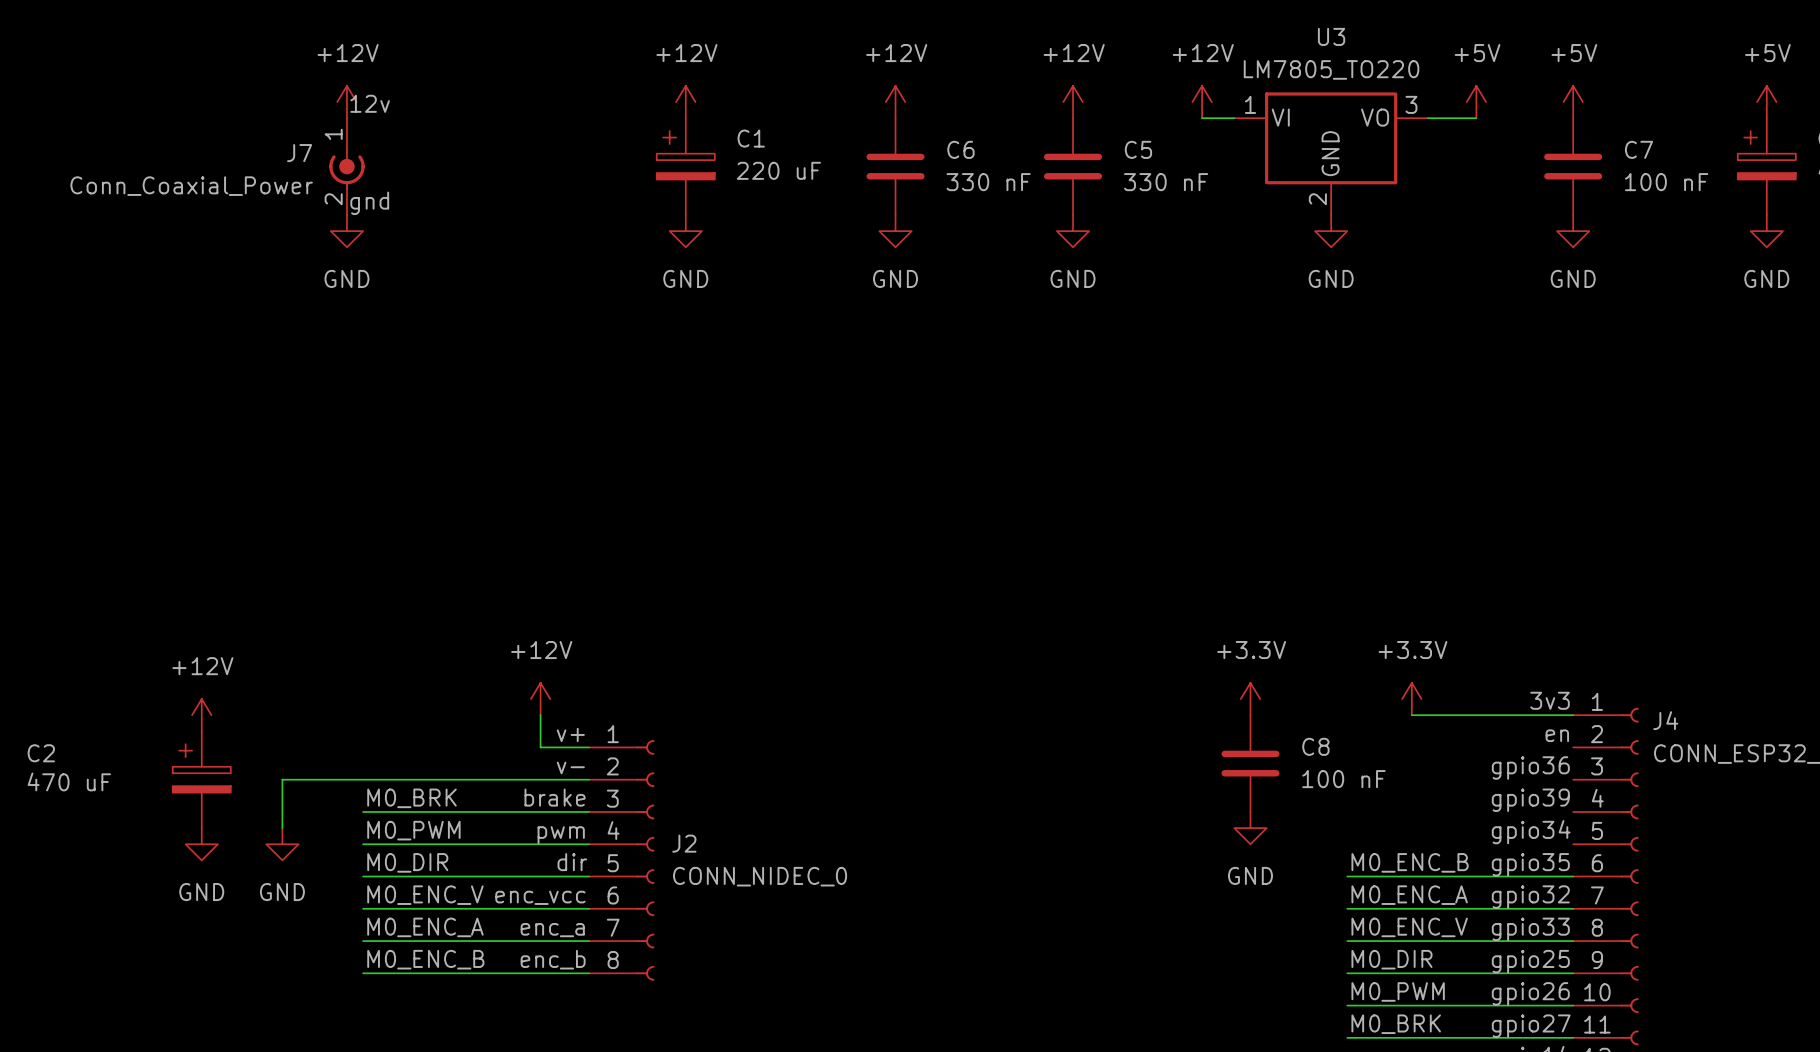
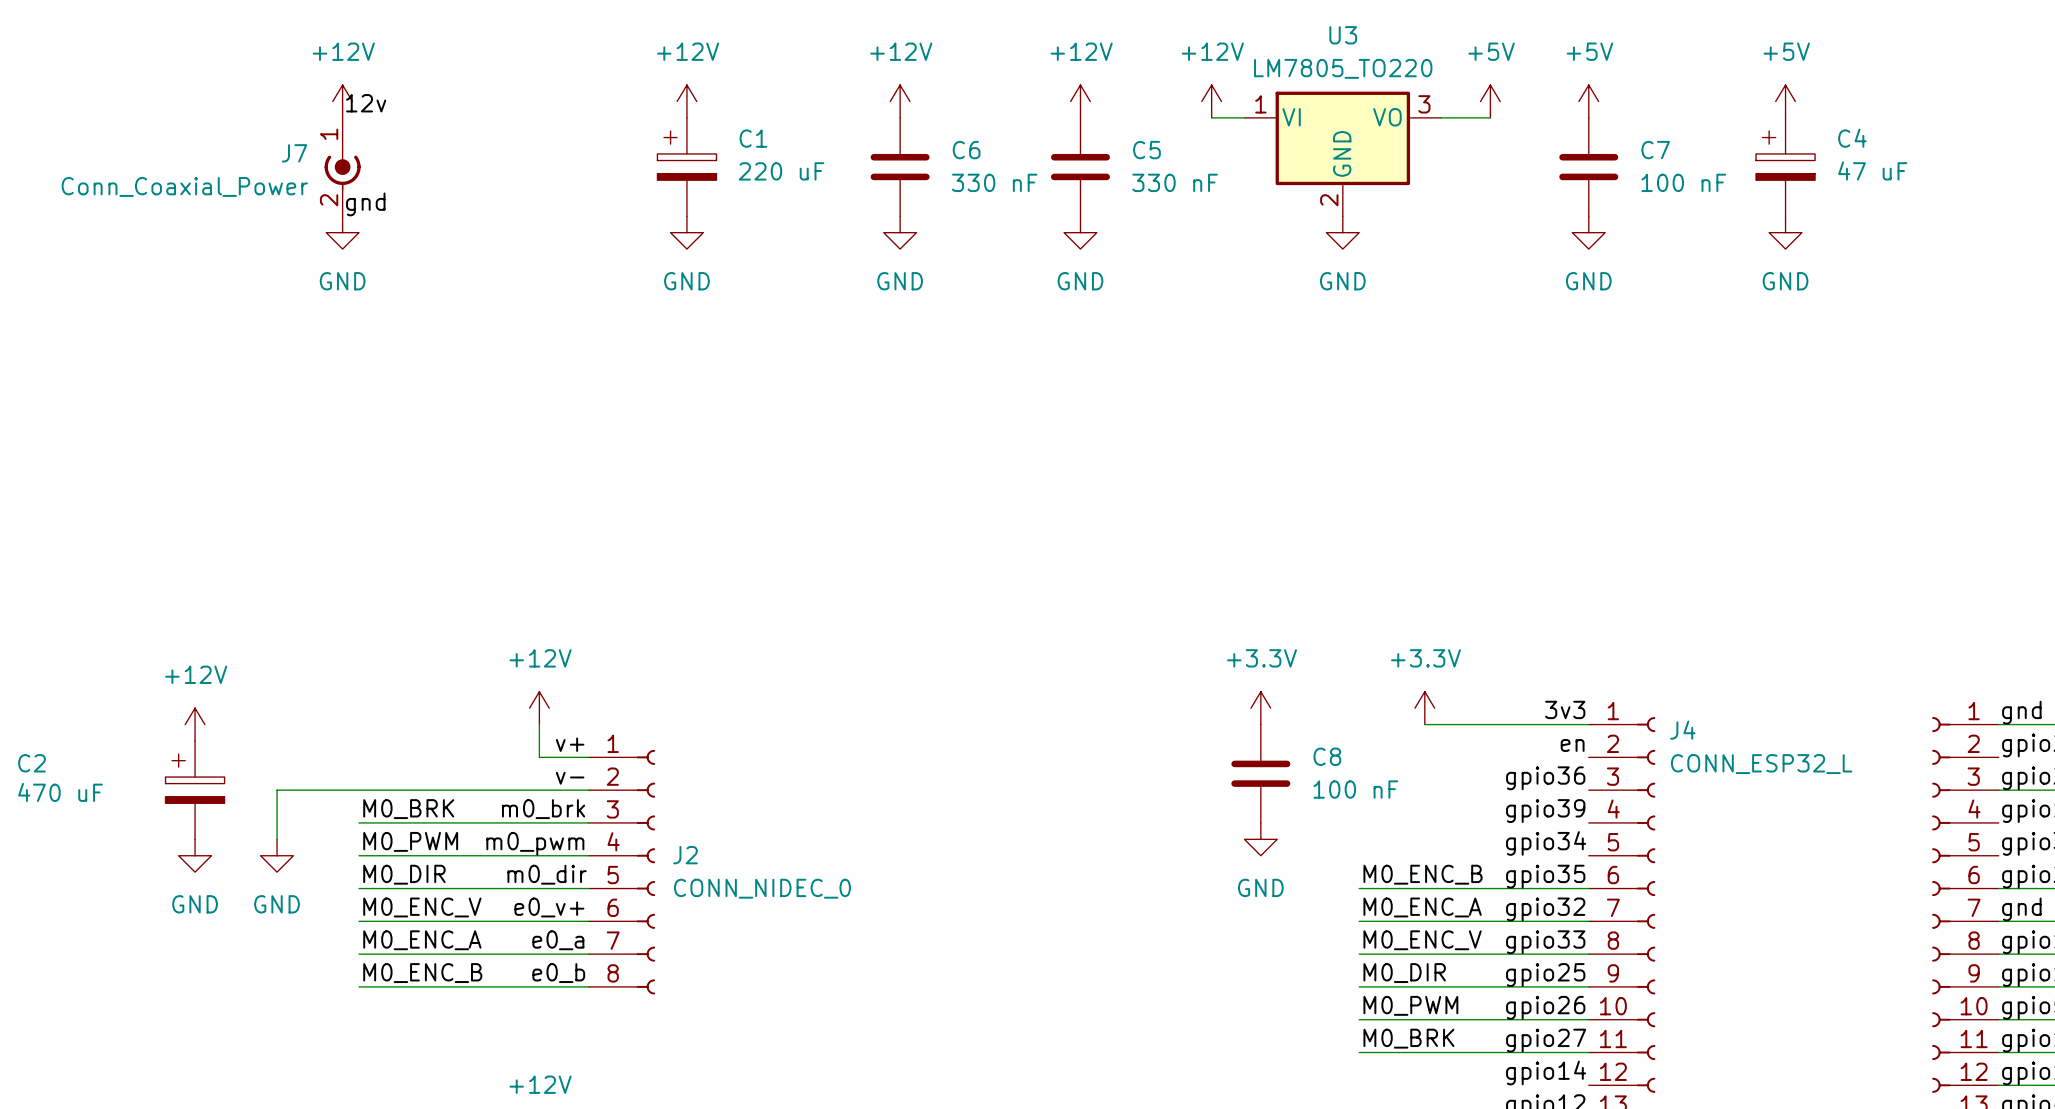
label: brake (555, 797) -> m0_brk (543, 809)
label: pwm (561, 835) -> m0_pwm (535, 843)
label: dir (572, 862) -> m0_dir (547, 874)
label: enc_vcc (540, 897) -> e0_v+ (549, 907)
label: enc_a (552, 930) -> e0_a (558, 940)
label: enc_b (553, 959) -> e0_b (558, 973)

